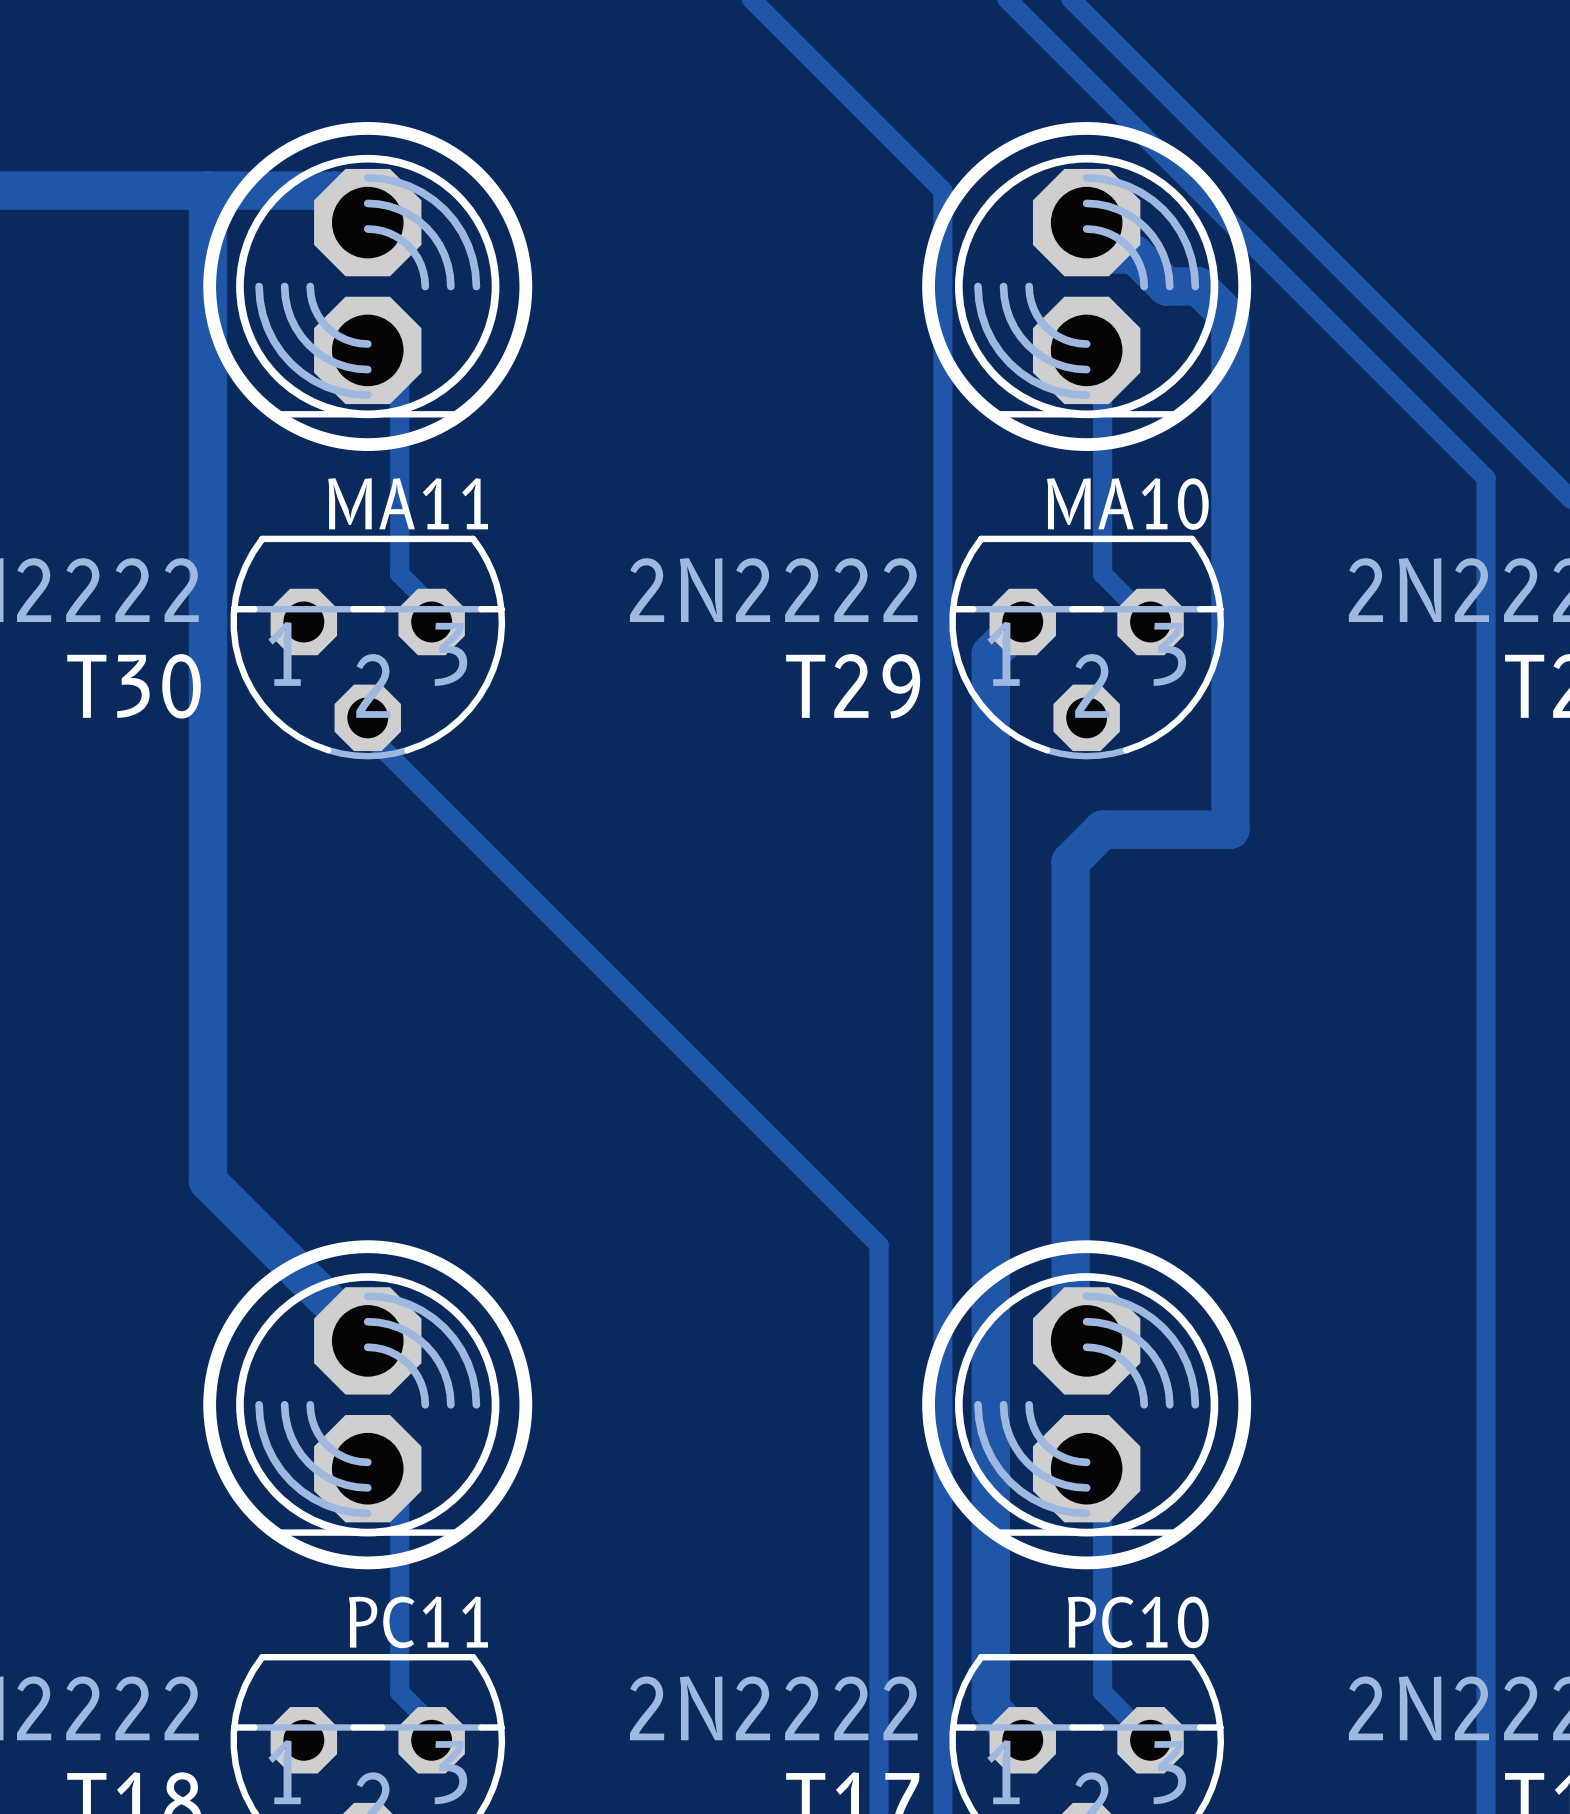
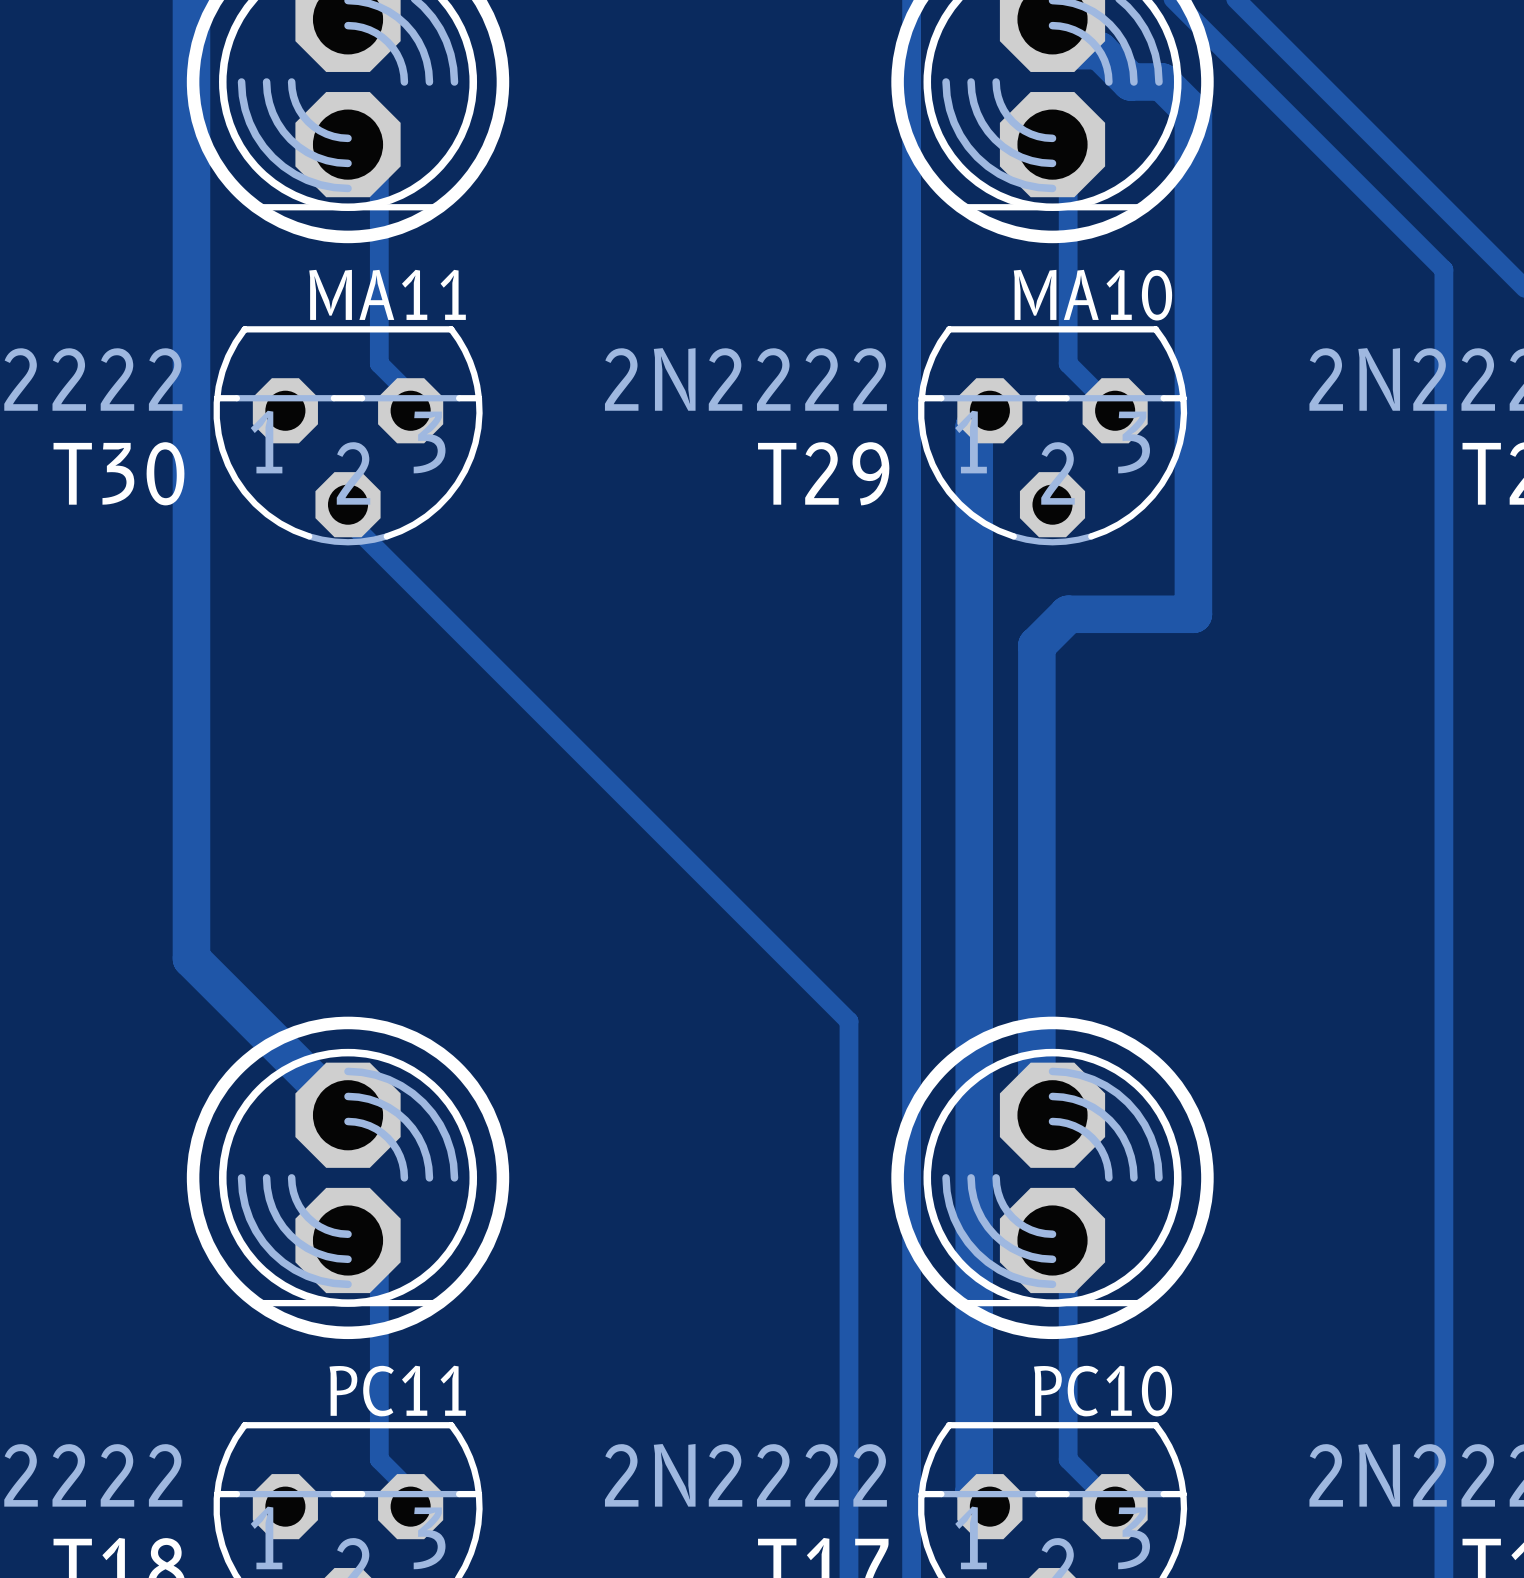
track: (1006, 637) (990, 653) (990, 1708) (1006, 1724) -> (974, 426) (974, 1490)

